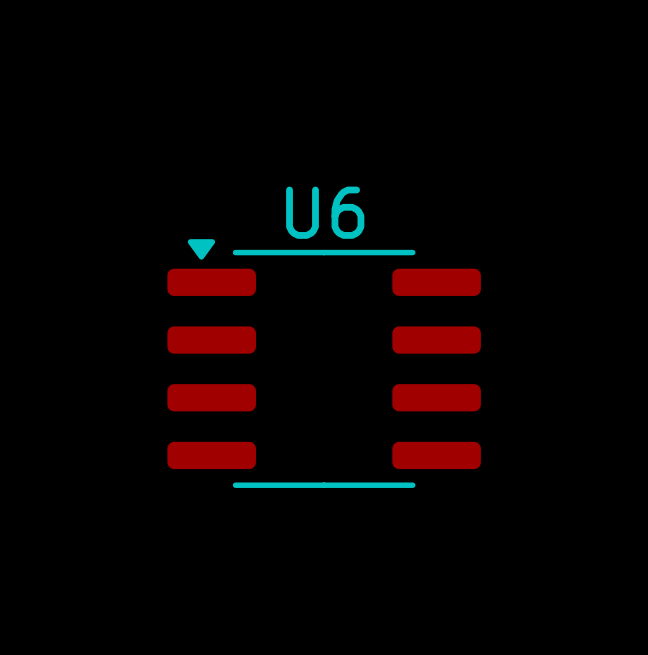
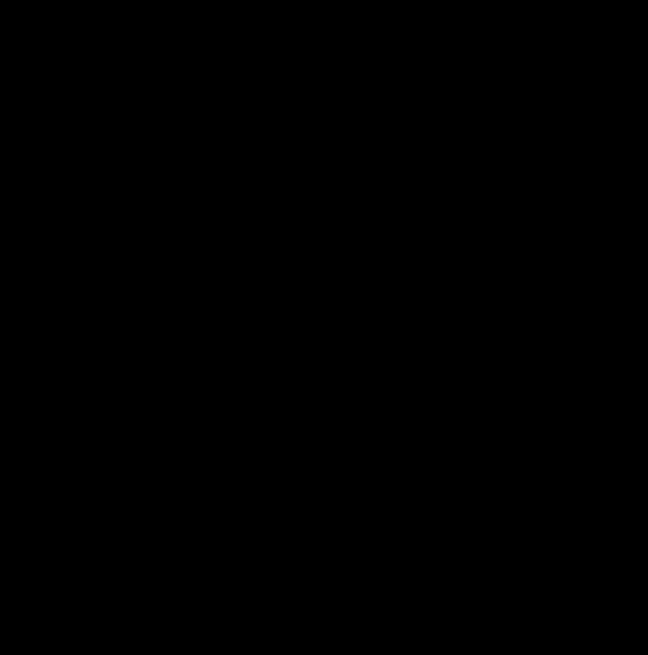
U6: (324, 363) -> none

